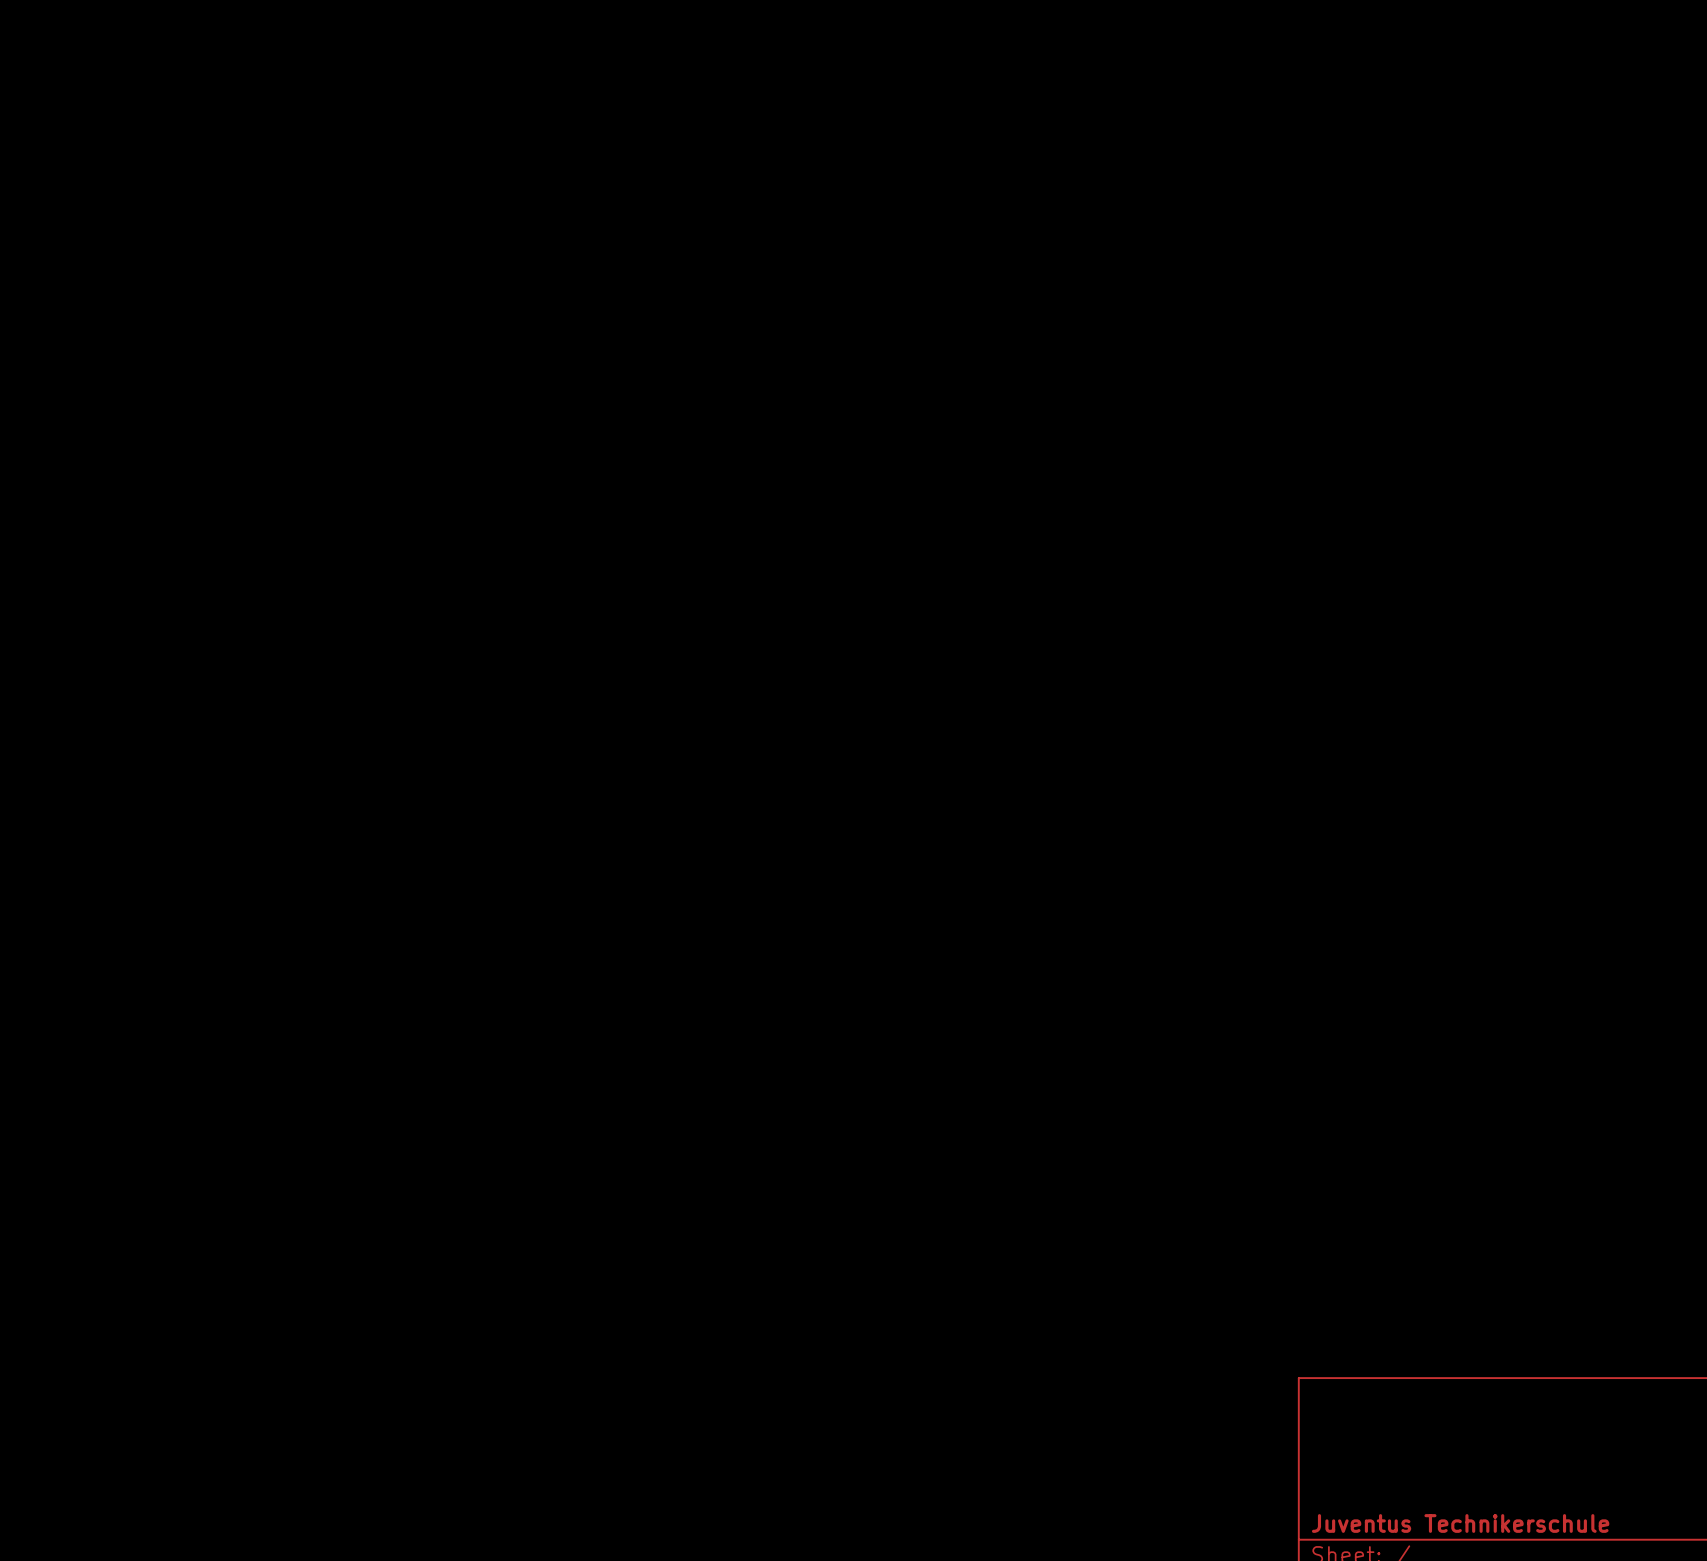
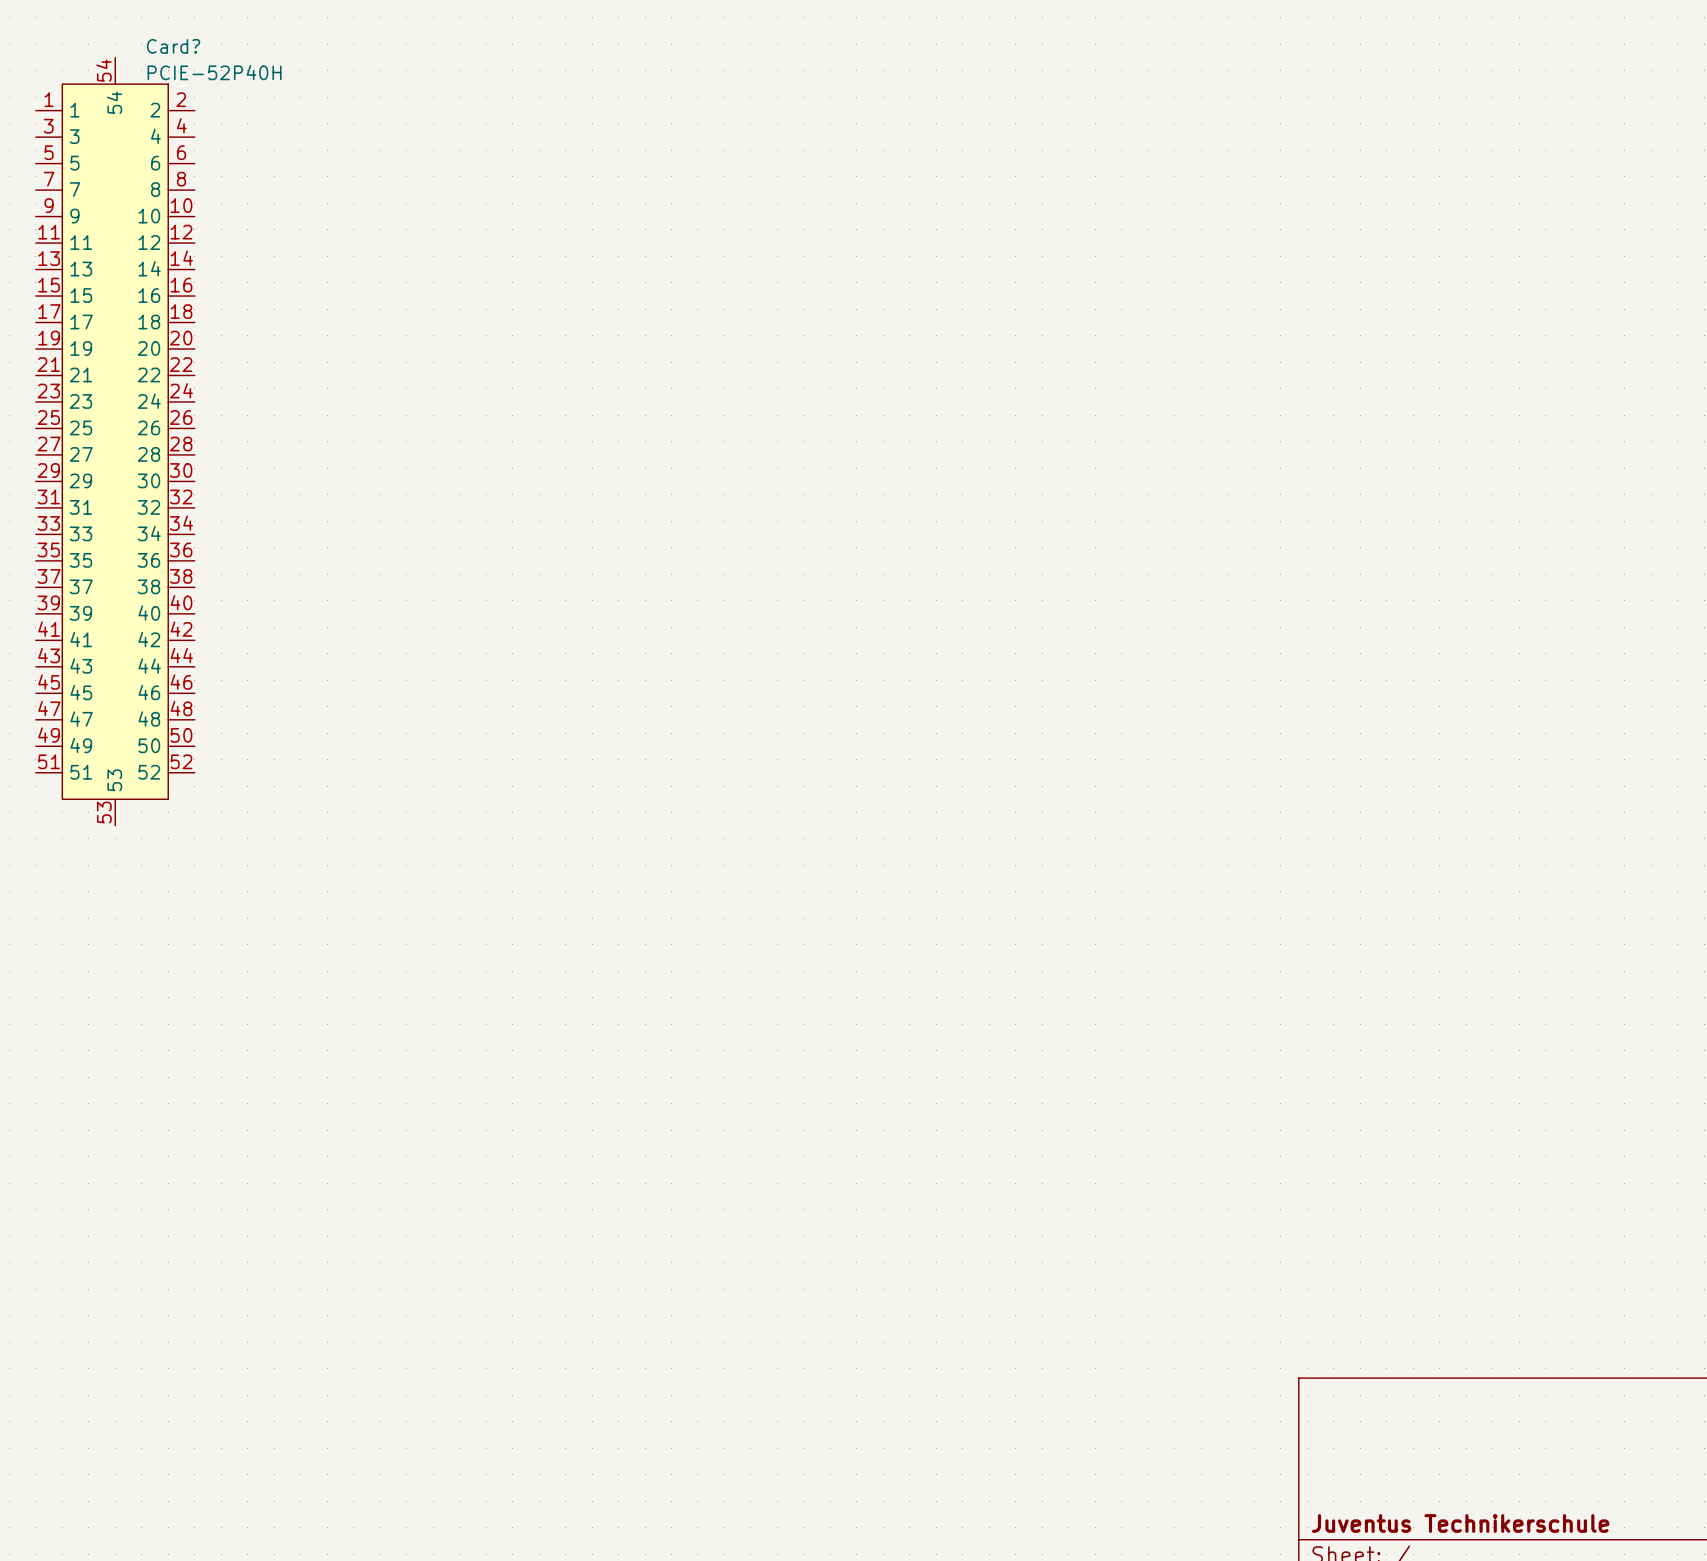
Card?: none -> PCIE-52P40H (115, 441)

